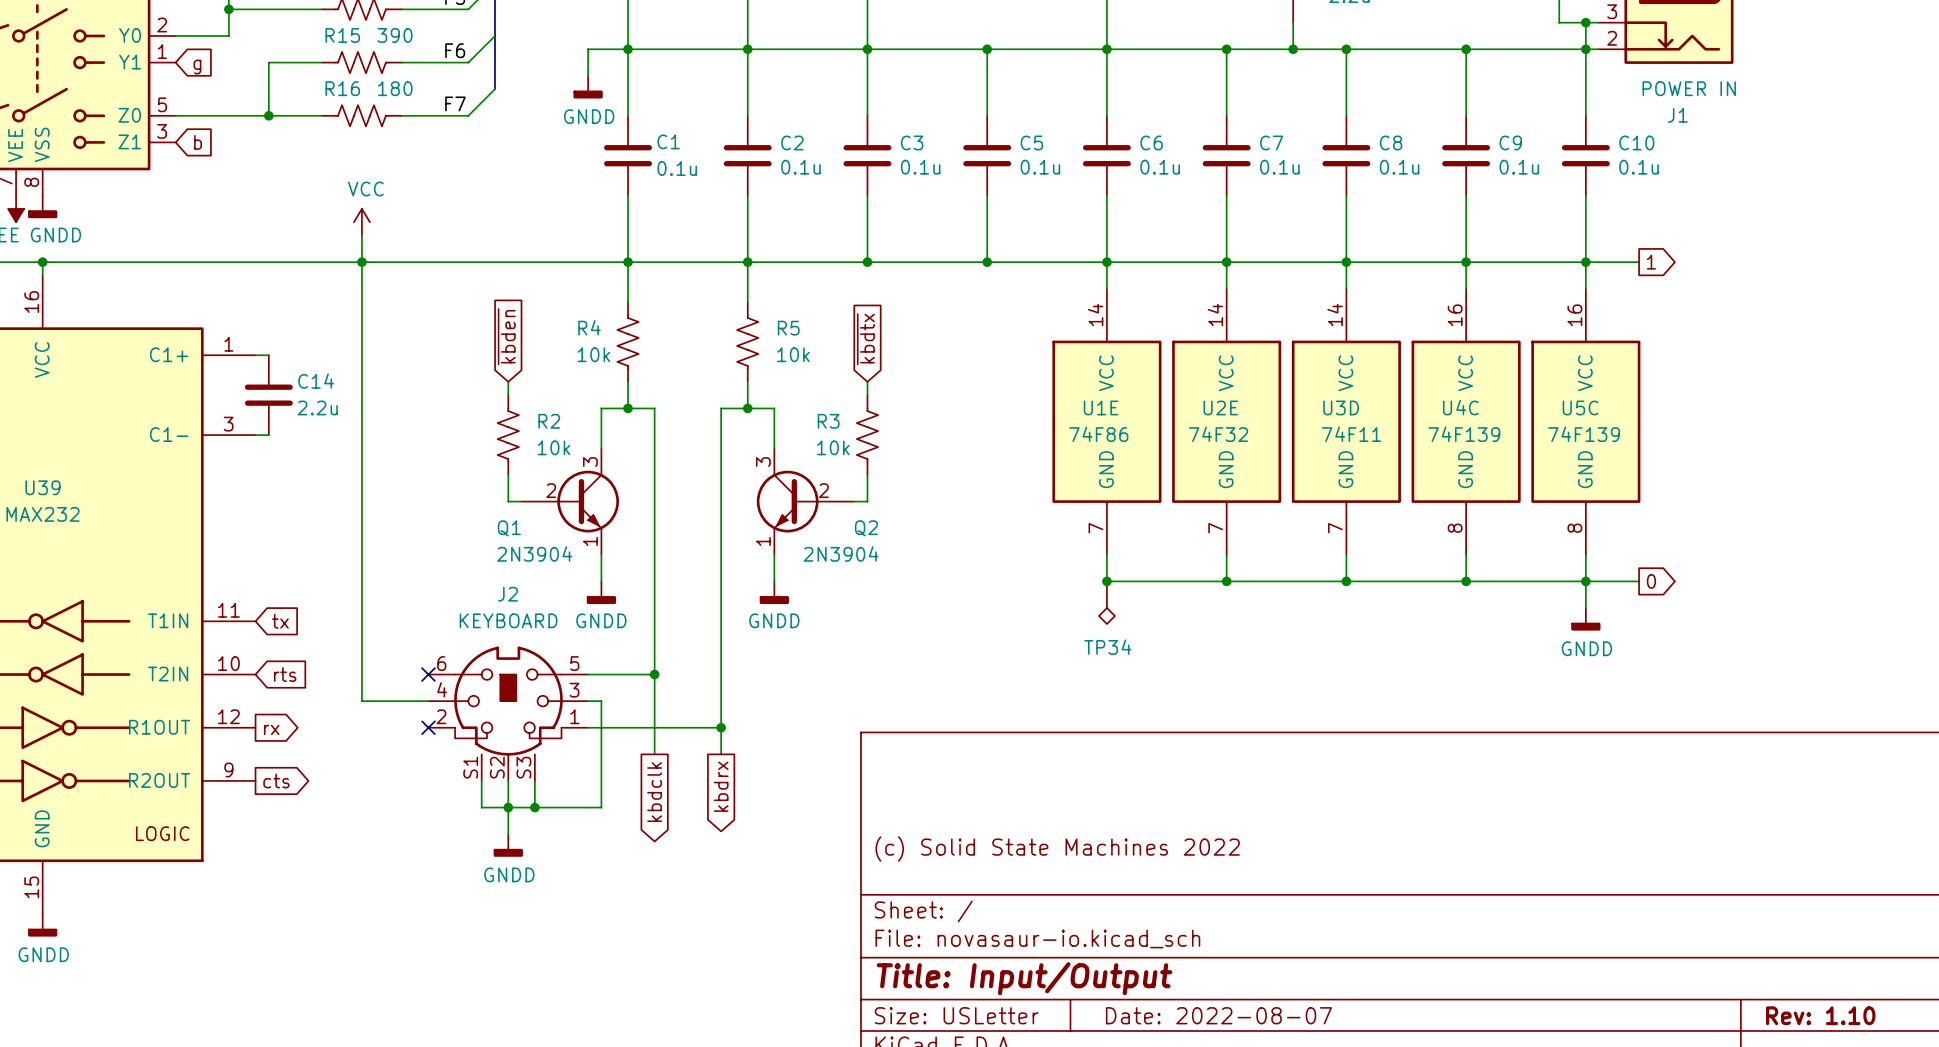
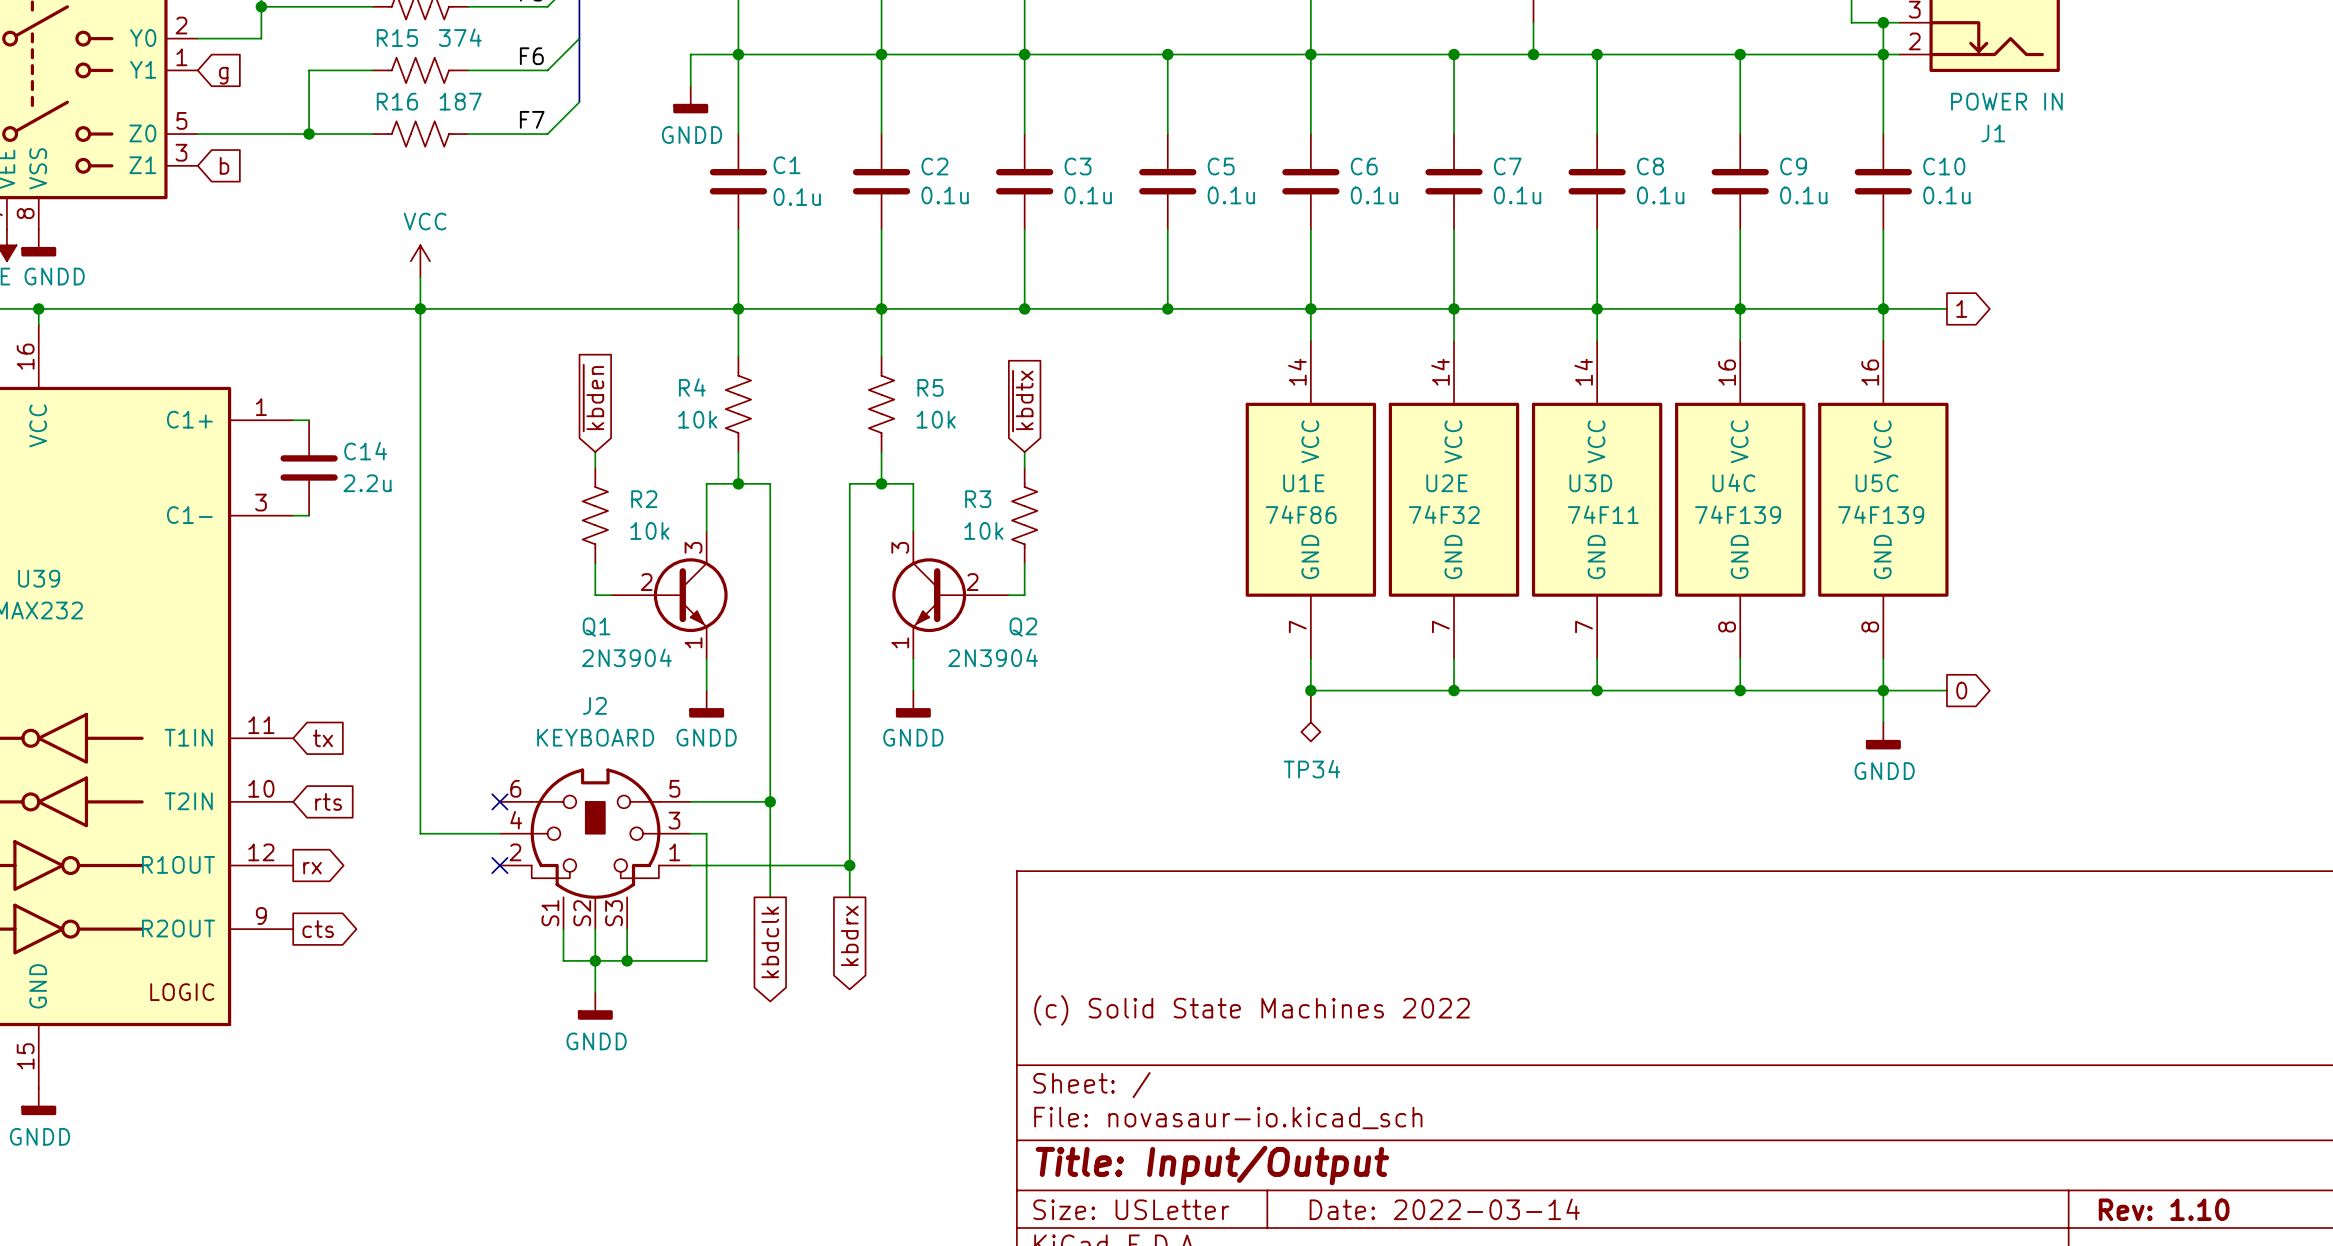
R15 value: 390 (394, 35) -> 374 (460, 37)
R16 value: 180 (395, 88) -> 187 (460, 101)
title block: Date: 2022-08-07 (1218, 1015) -> Date: 2022-03-14 (1444, 1209)

